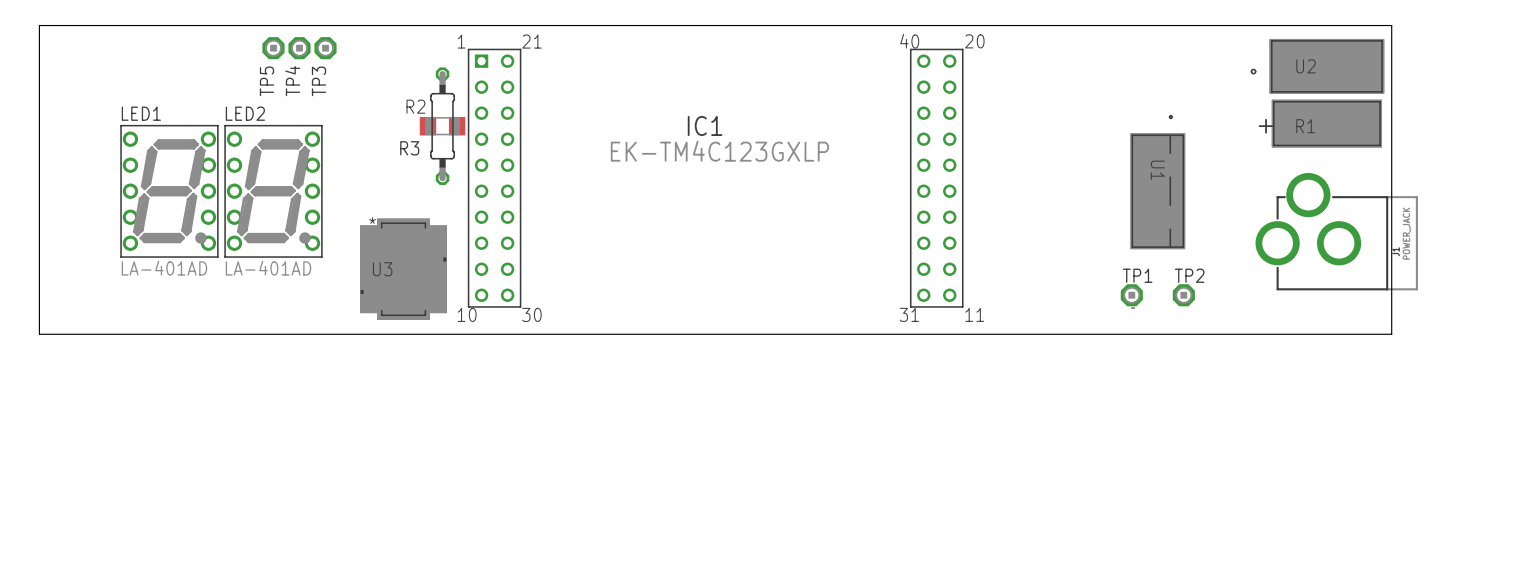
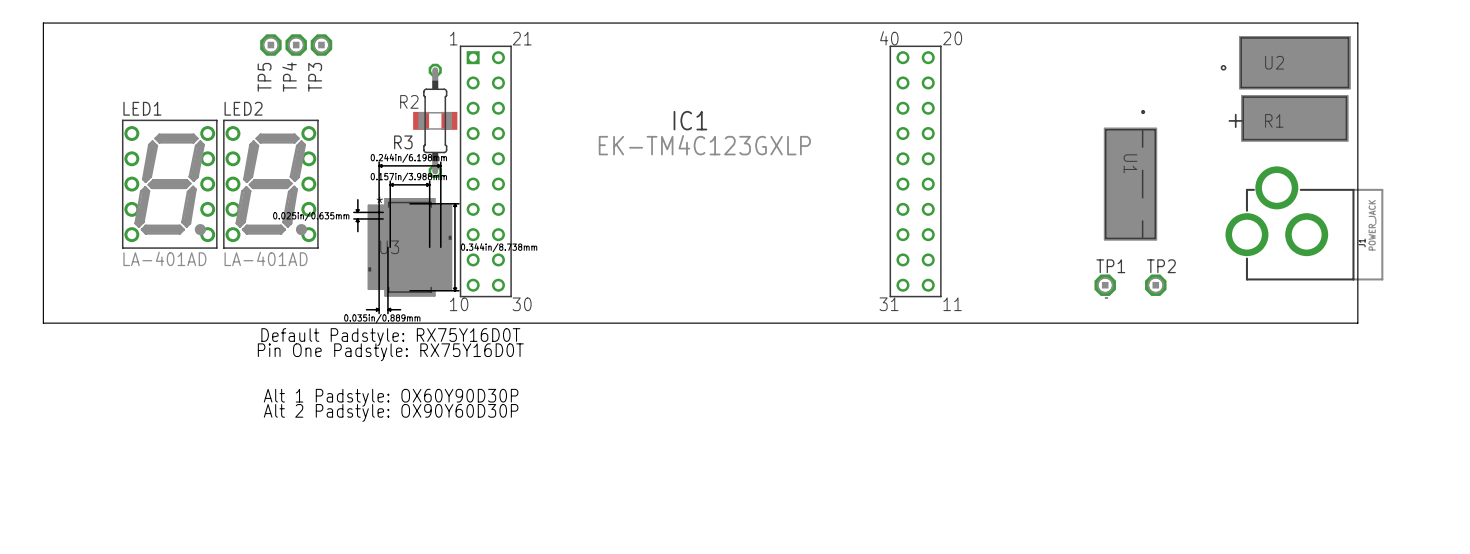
part footprint: [360, 218, 447, 320] -> [353, 161, 460, 315]

